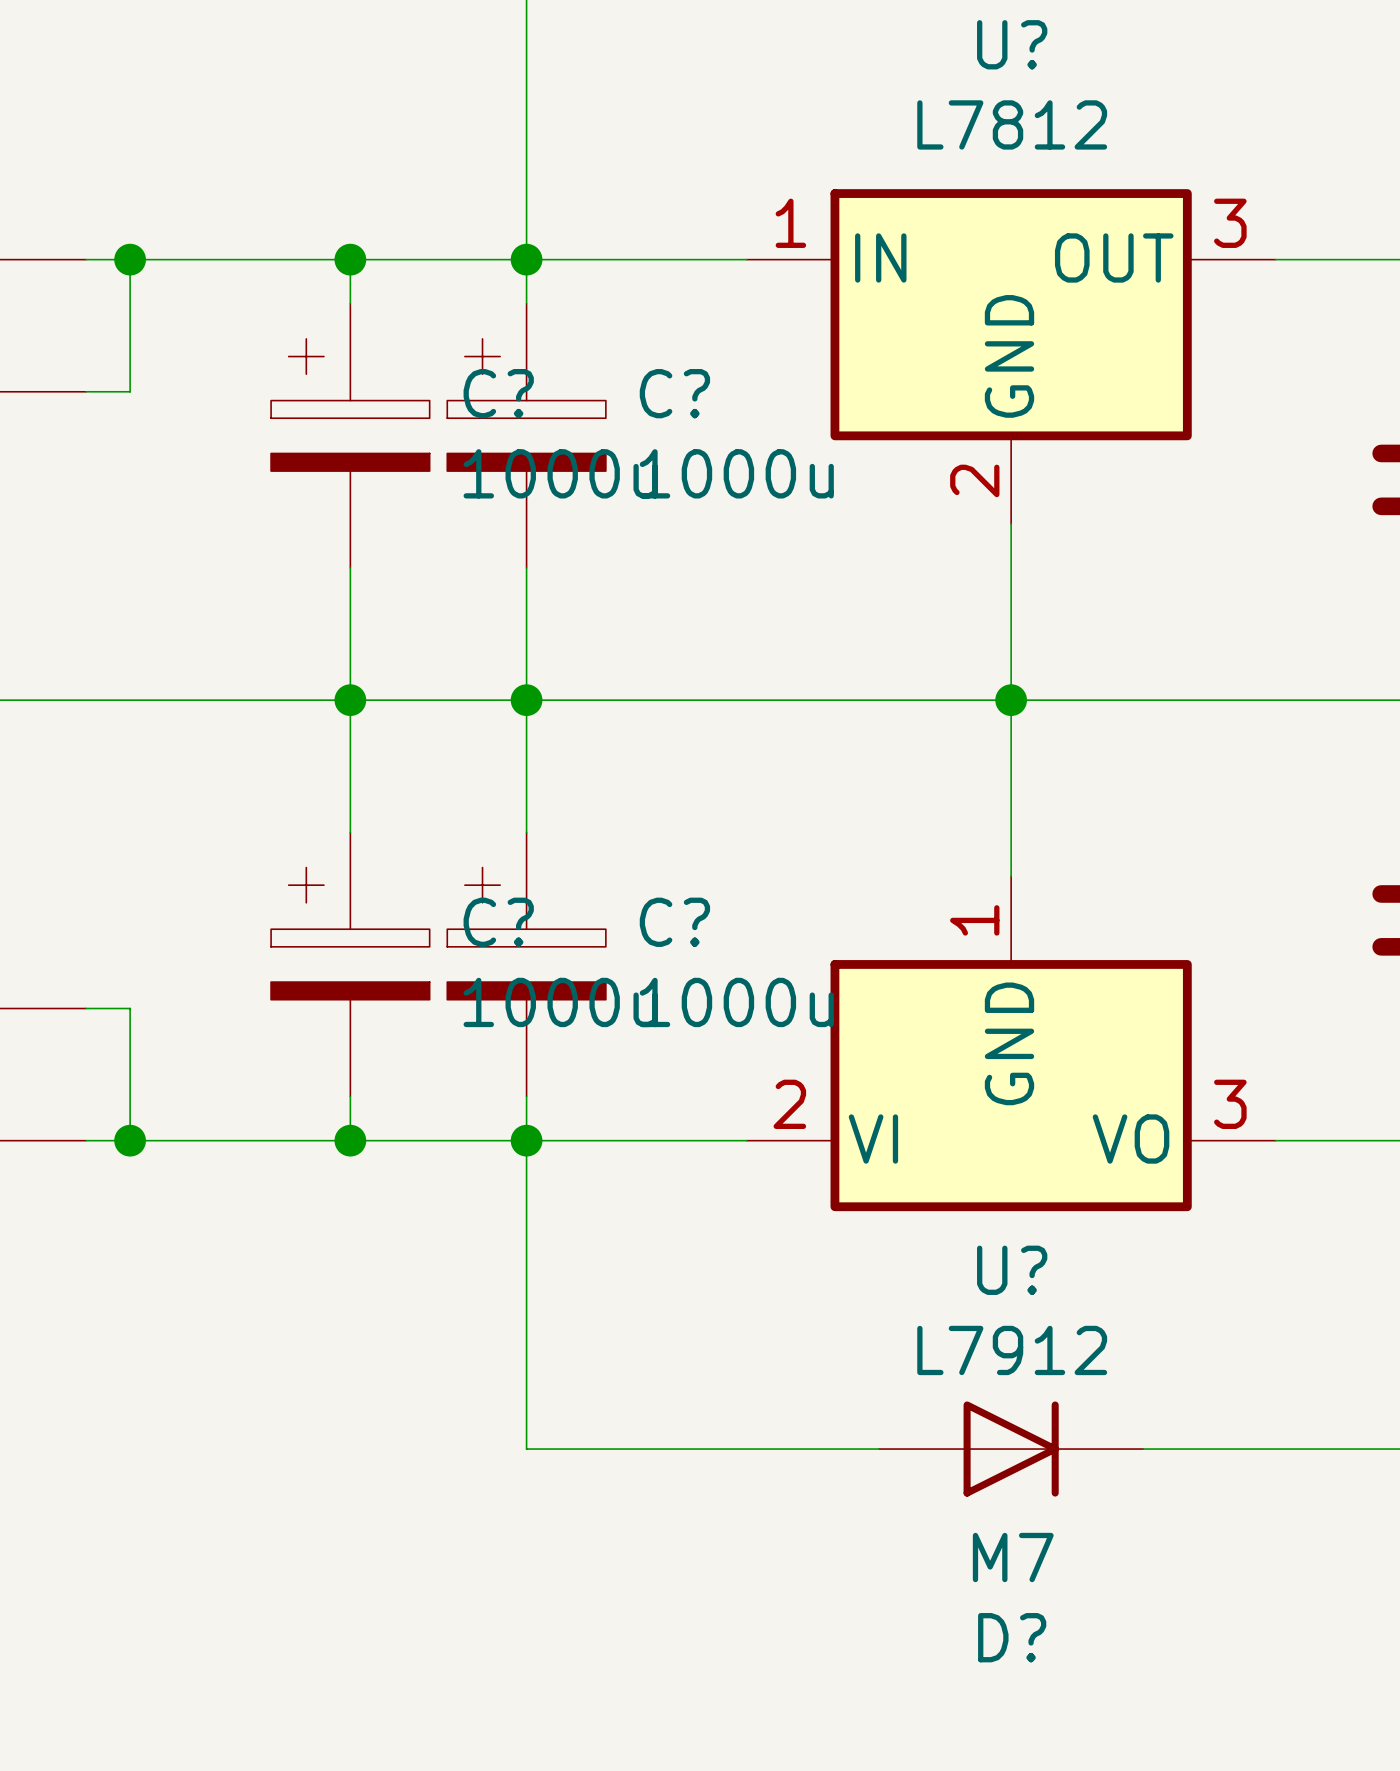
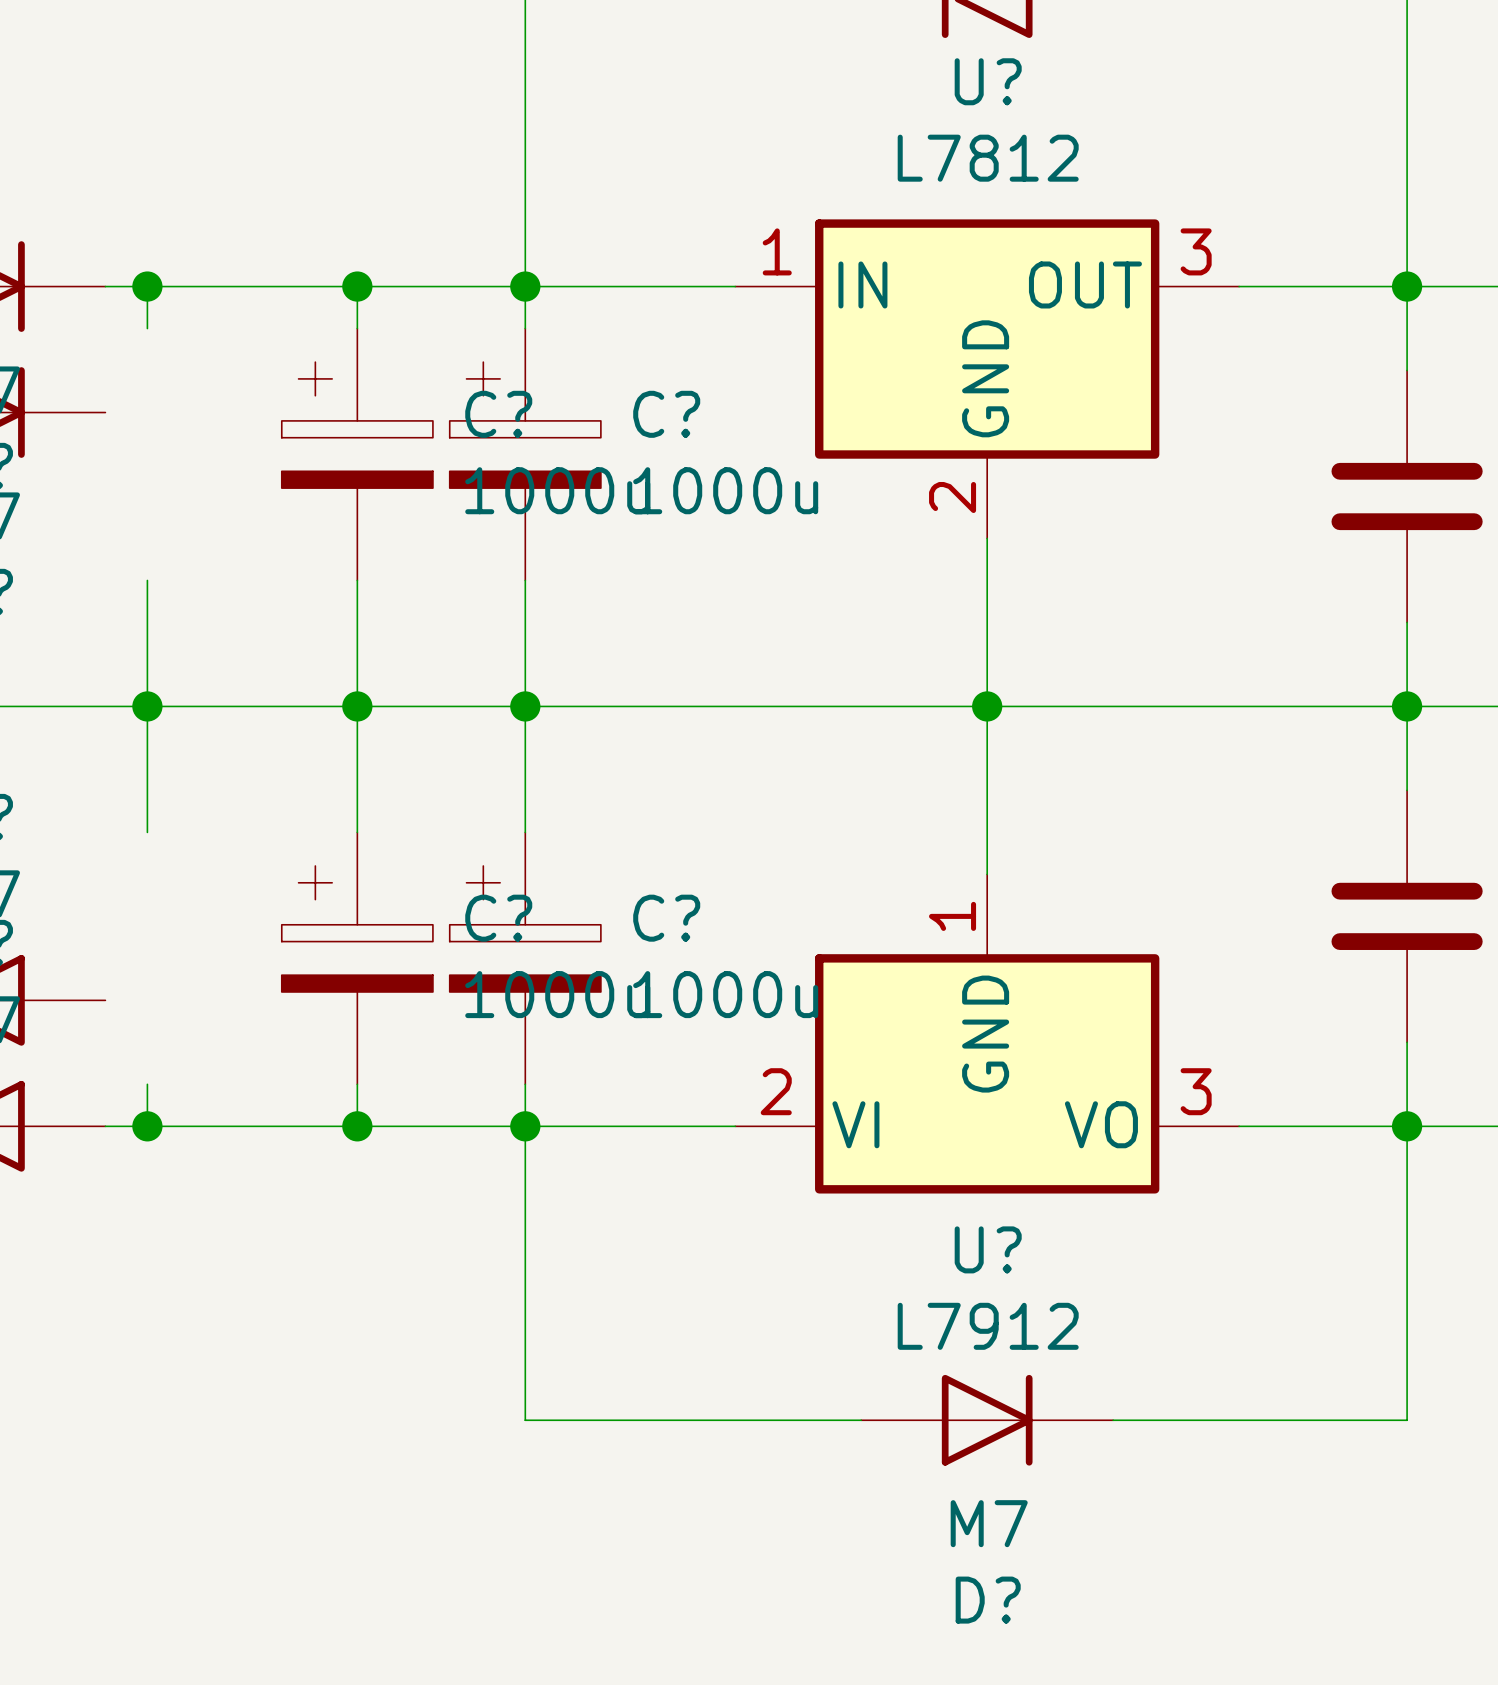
wire: (130, 303) (130, 391) (86, 391) -> none
wire: none -> (147, 580) (147, 832)
junction: none -> (147, 706)
wire: (86, 1008) (130, 1008) (130, 1096) -> none

